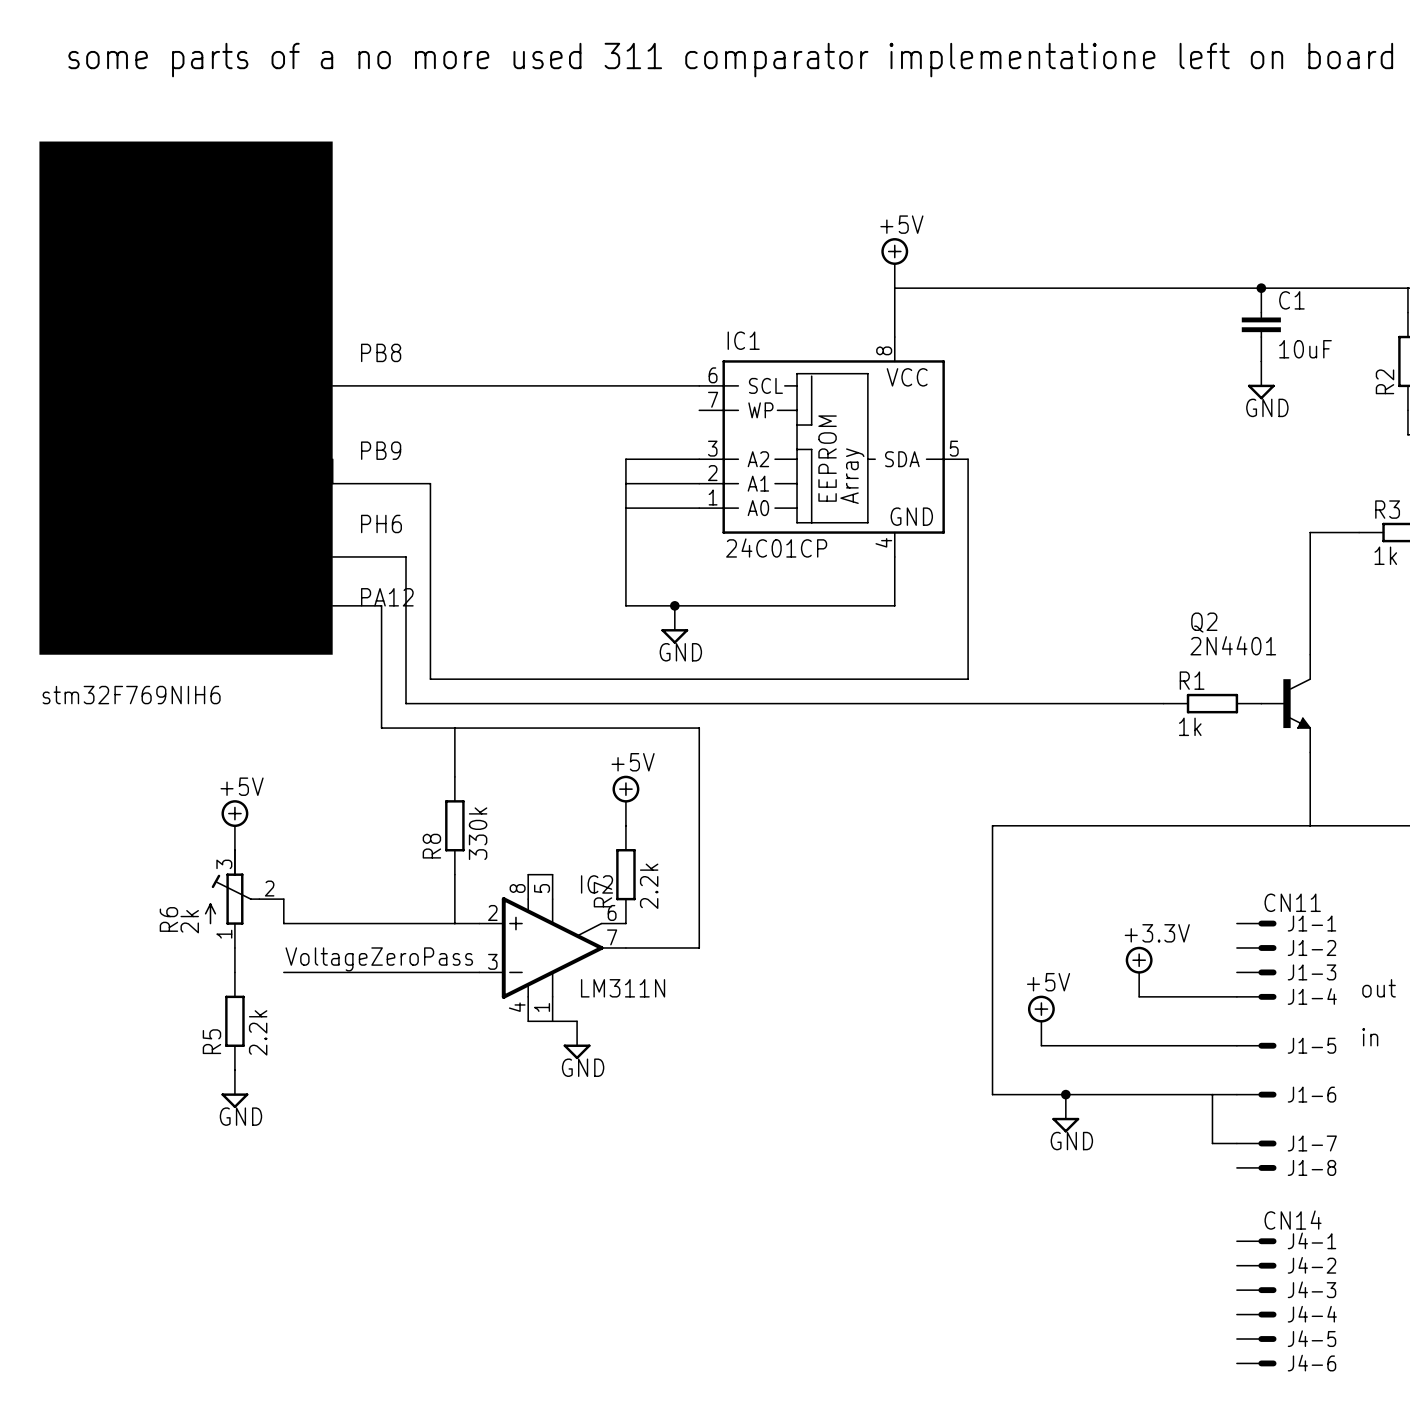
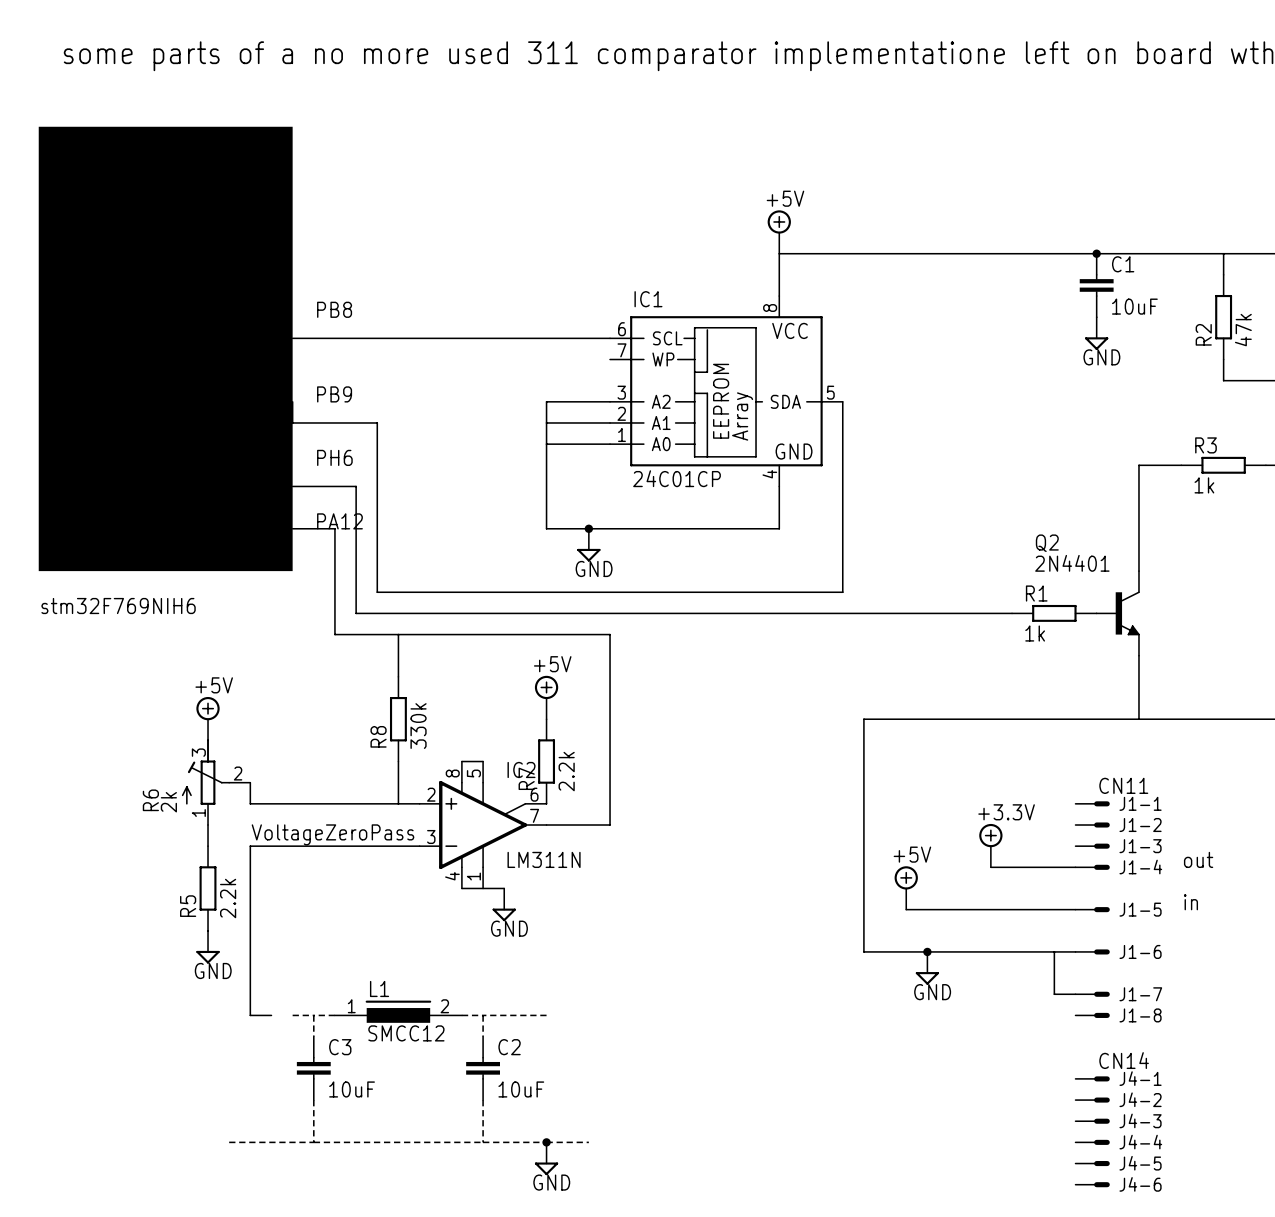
wire: none -> (250, 846) (250, 1015) (271, 1015)
L1: none -> SMCC12 (398, 1011)
wire: none -> (292, 1015) (334, 1015)
wire: none -> (313, 1015) (313, 1036)
wire: none -> (461, 1015) (546, 1015)
wire: none -> (483, 1015) (483, 1036)
C3: none -> 10uF (313, 1068)
C2: none -> 10uF (483, 1068)
wire: none -> (313, 1100) (313, 1142)
wire: none -> (483, 1100) (483, 1142)
wire: none -> (229, 1142) (588, 1142)
junction: none -> (546, 1142)
power symbol: none -> GND (546, 1158)

